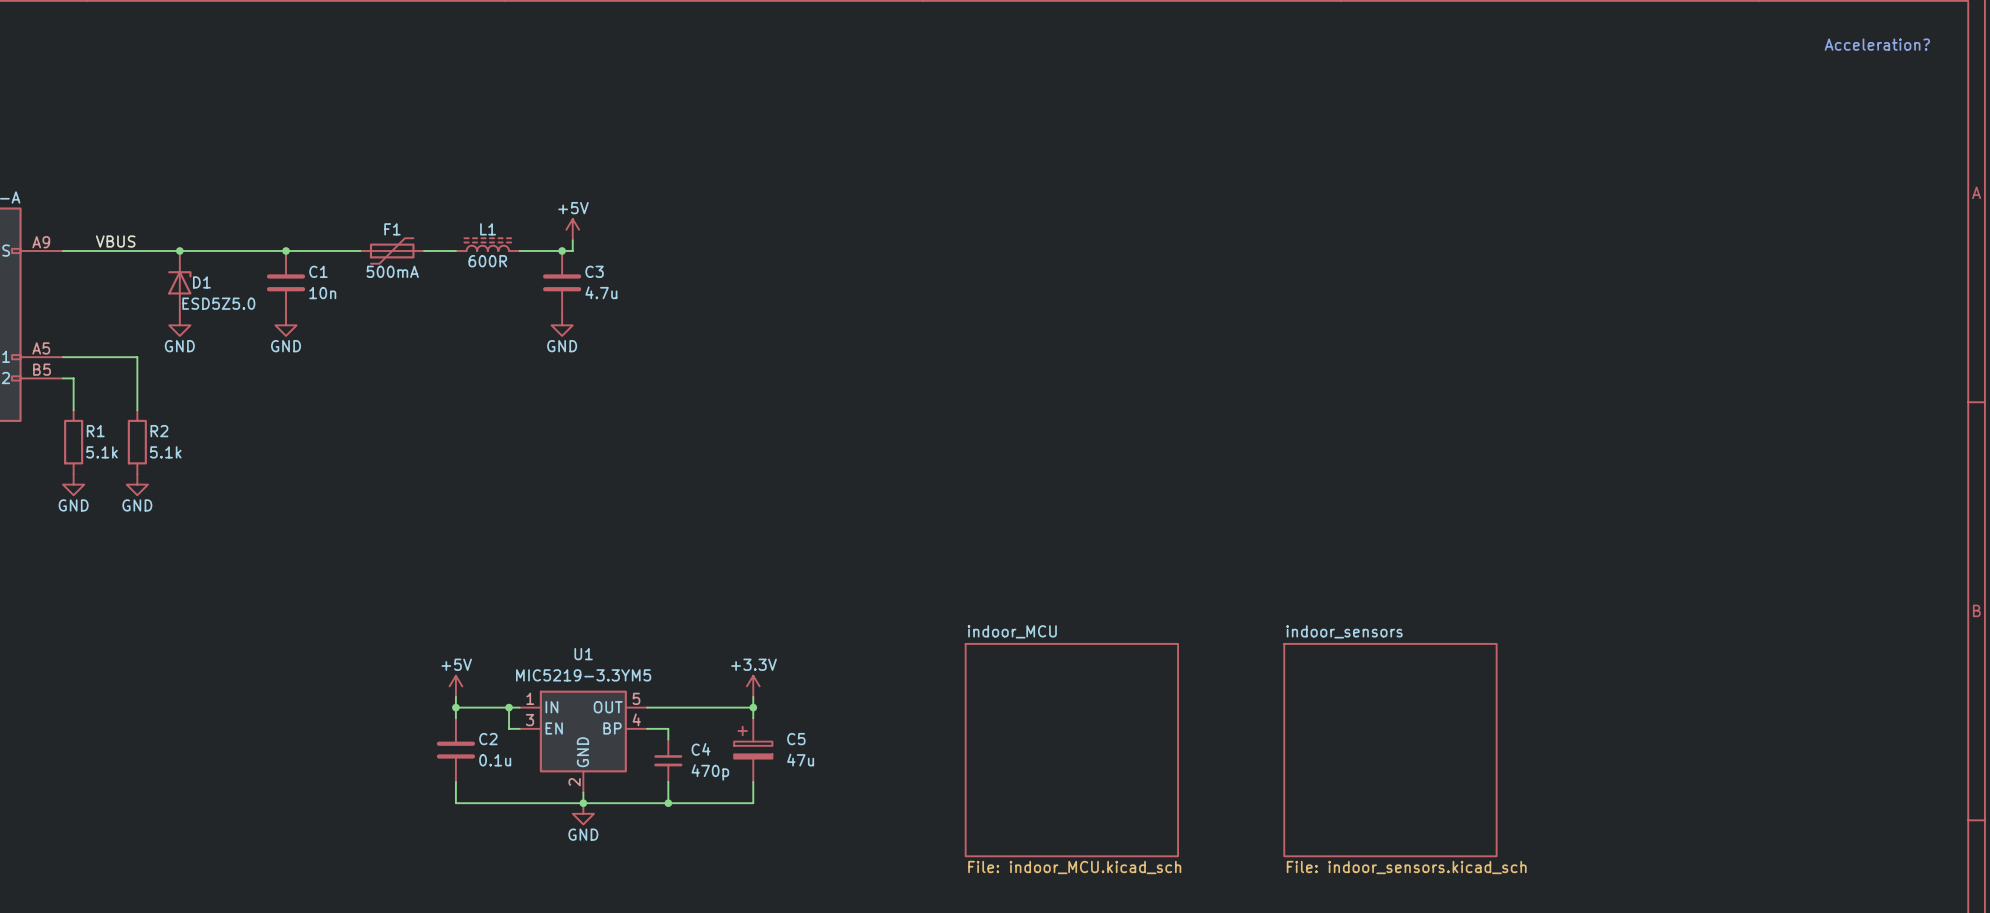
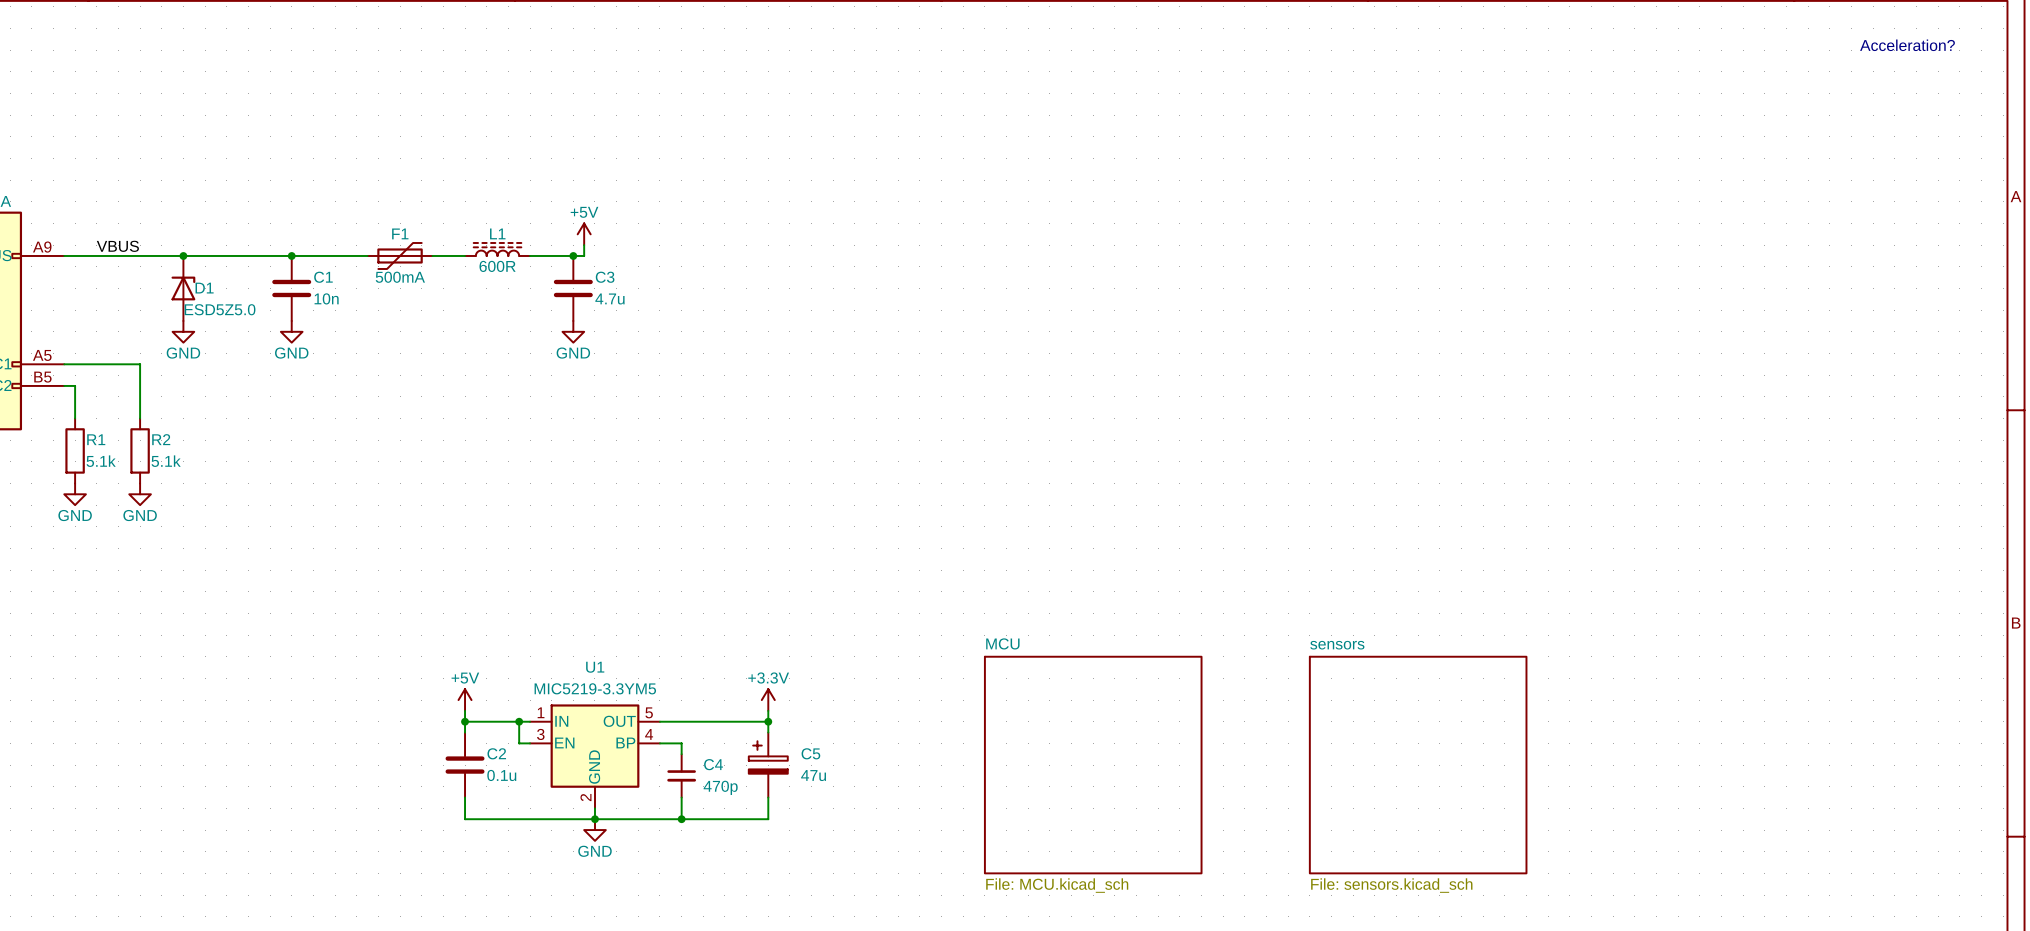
sheet indoor_MCU name: indoor_MCU (1012, 631) -> MCU (1002, 643)
sheet indoor_sensors name: indoor_sensors (1344, 631) -> sensors (1337, 645)
sheet indoor_MCU value: File: indoor_MCU.kicad_sch (1074, 867) -> File: MCU.kicad_sch (1057, 885)
sheet indoor_sensors value: File: indoor_sensors.kicad_sch (1406, 867) -> File: sensors.kicad_sch (1391, 885)

